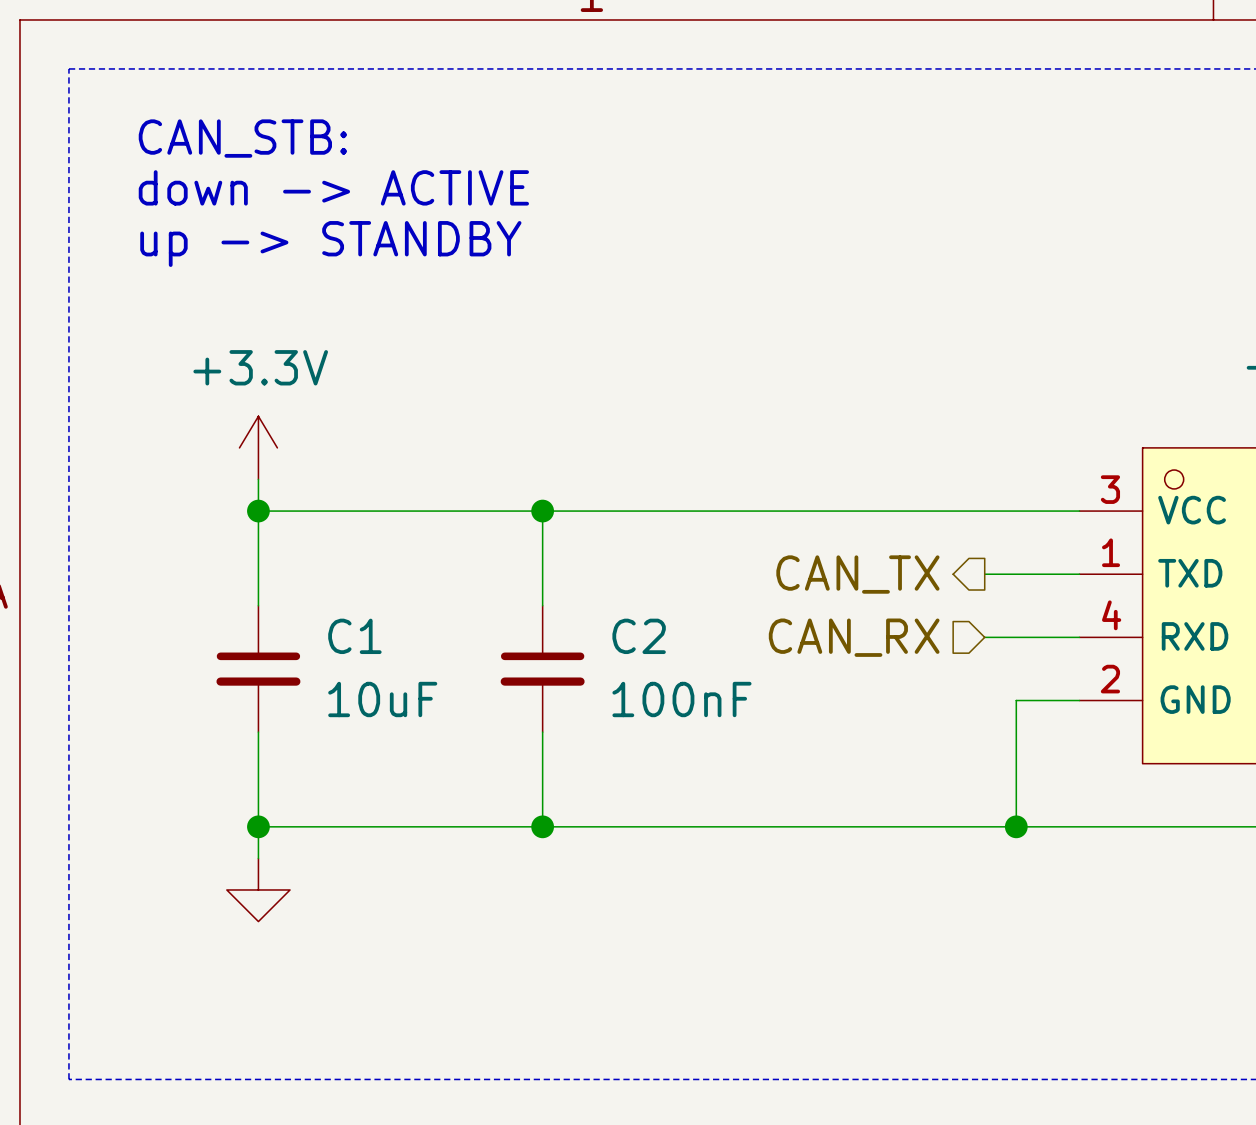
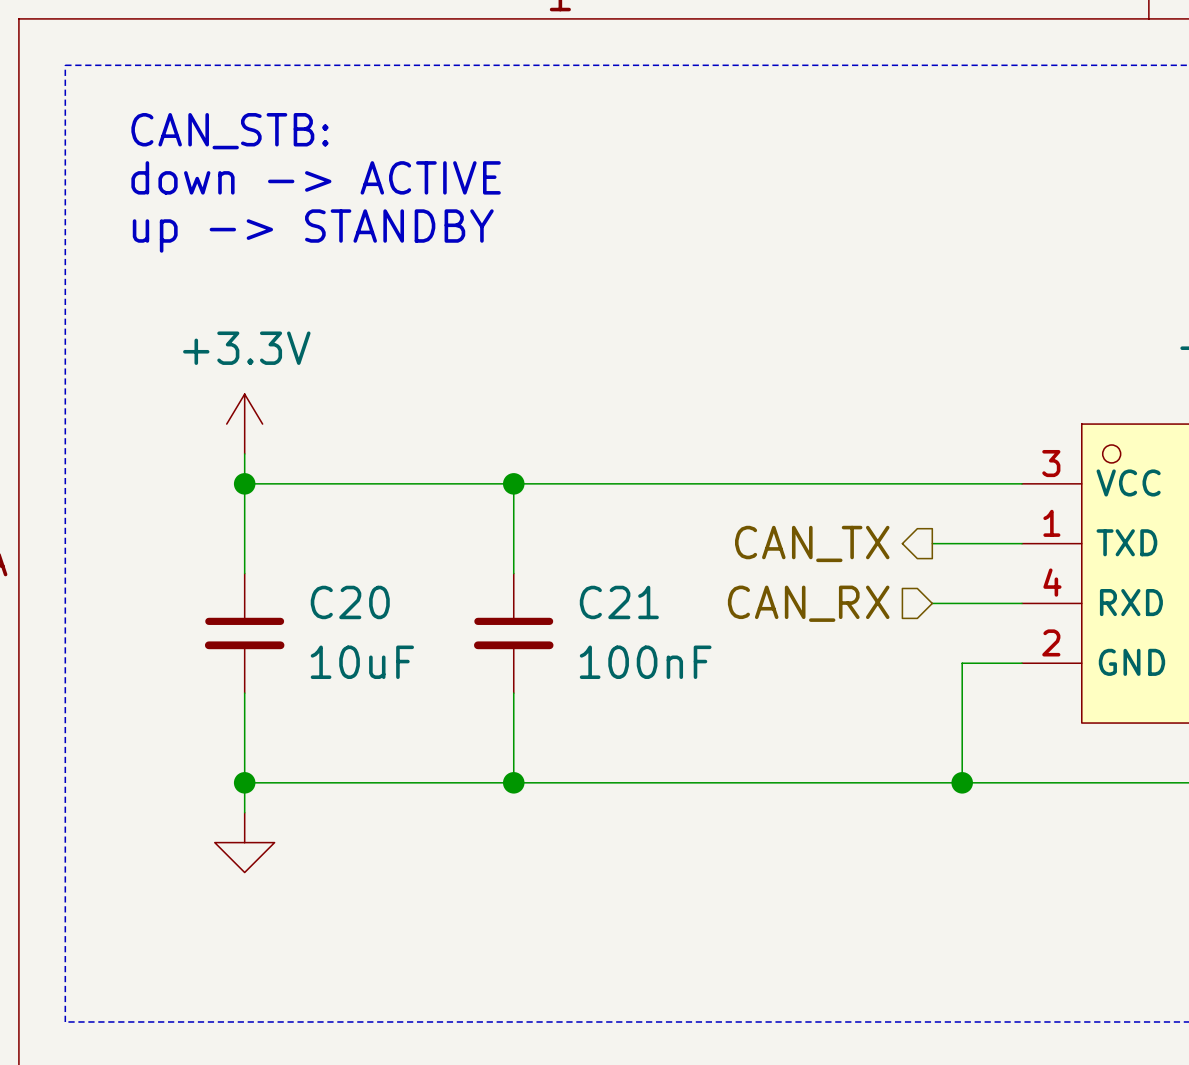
C1 name: C1 (354, 636) -> C20 (350, 602)
C2 name: C2 (639, 636) -> C21 (619, 602)

